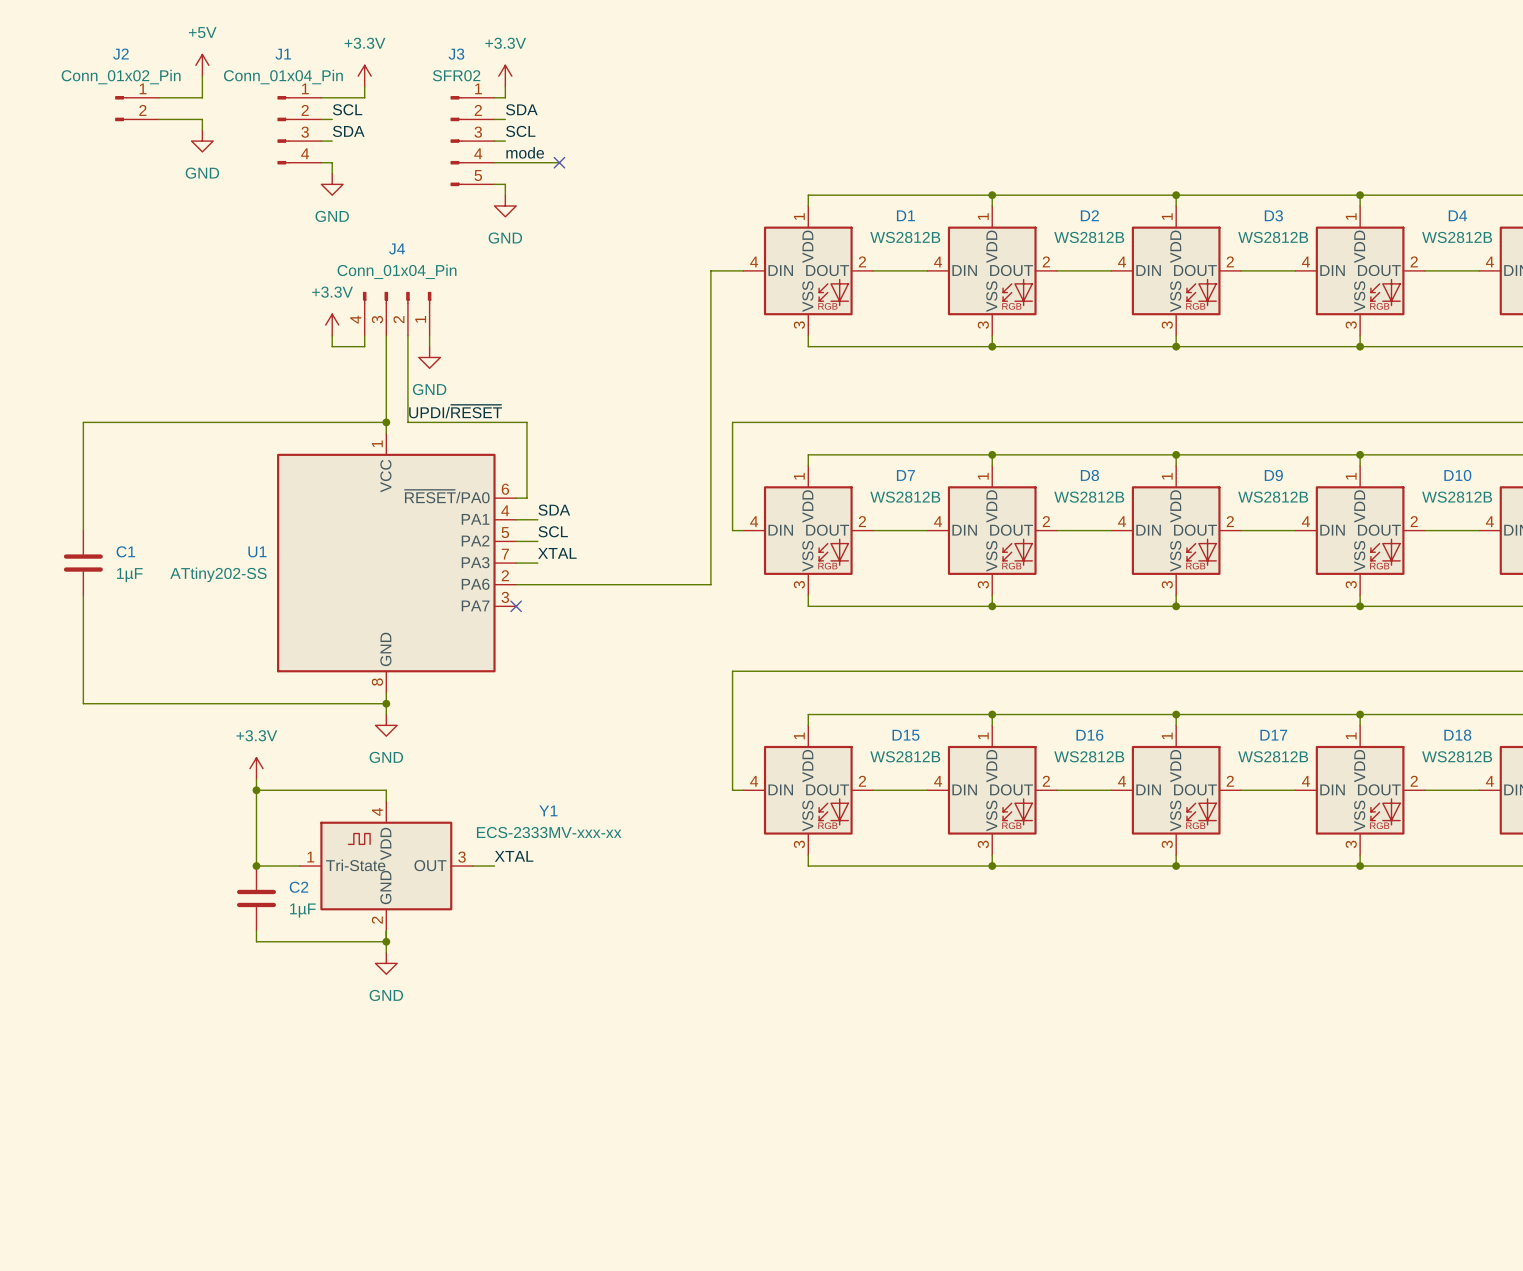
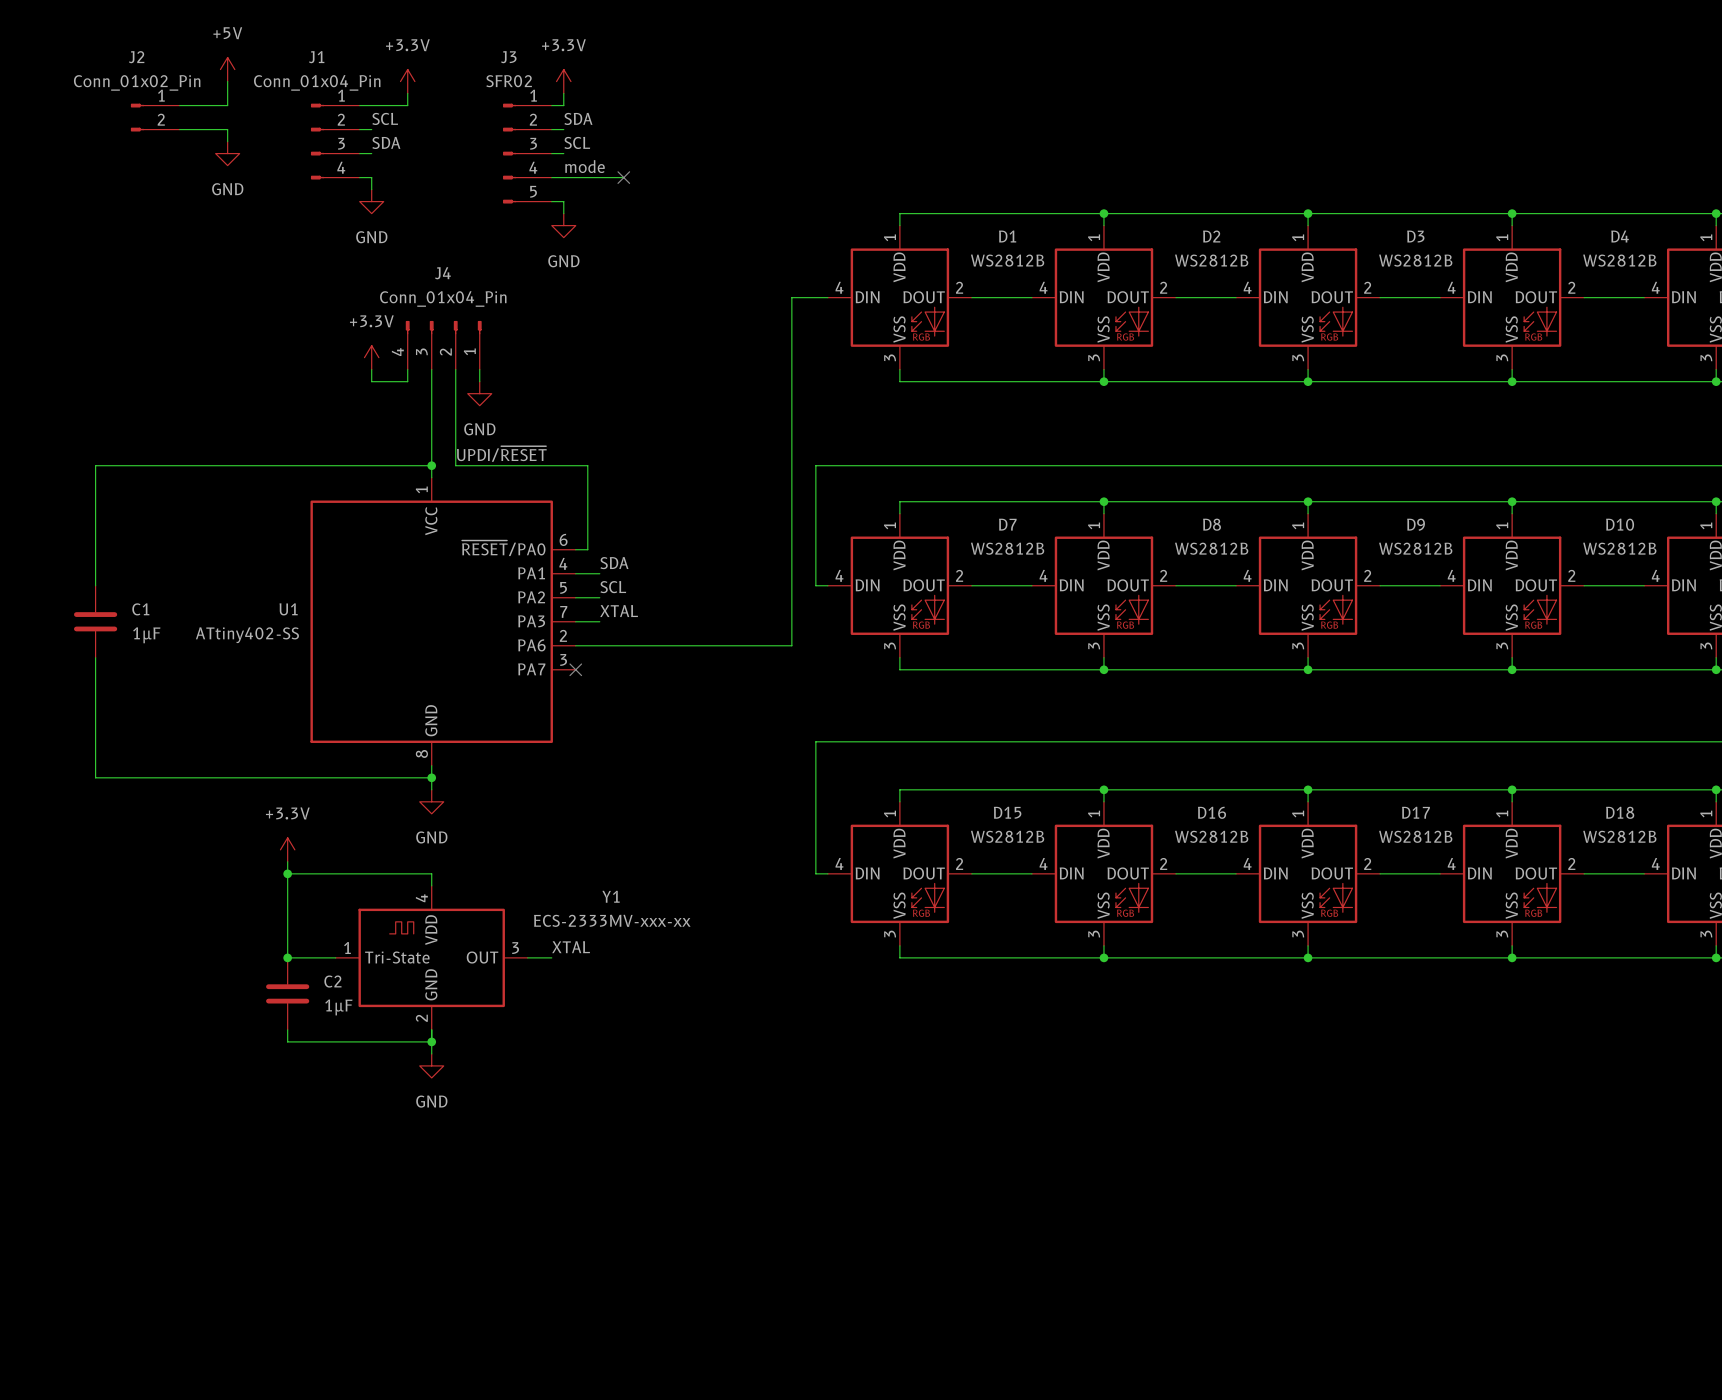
U1 value: ATtiny202-SS (218, 574) -> ATtiny402-SS (247, 635)

